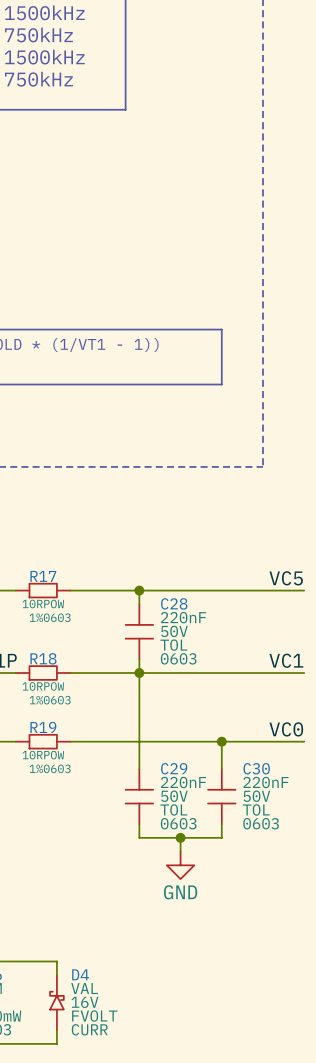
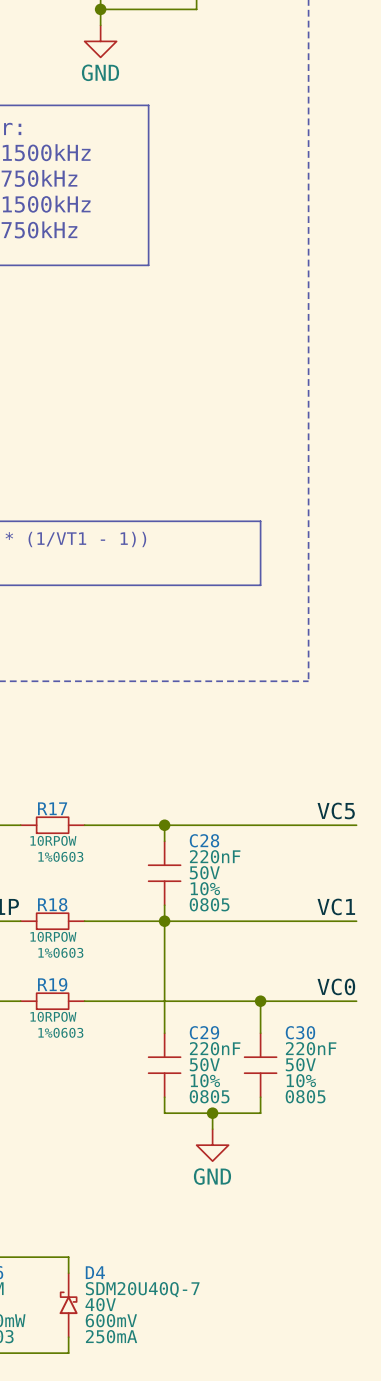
C28 text: TOL (173, 645) -> 10% (205, 888)
C28 text: 0603 (178, 658) -> 0805 (209, 904)
C29 text: TOL (173, 809) -> 10% (205, 1080)
C30 text: TOL (256, 809) -> 10% (301, 1080)
C29 text: 0603 (178, 823) -> 0805 (209, 1096)
C30 text: 0603 (261, 823) -> 0805 (305, 1096)
D4 value: VAL (84, 988) -> SDM20U40Q-7 (142, 1289)
D4 text: 16V (84, 1002) -> 40V (100, 1304)
D4 text: FVOLT (94, 1016) -> 600mV (111, 1320)
D4 text: CURR (89, 1029) -> 250mA (111, 1336)

